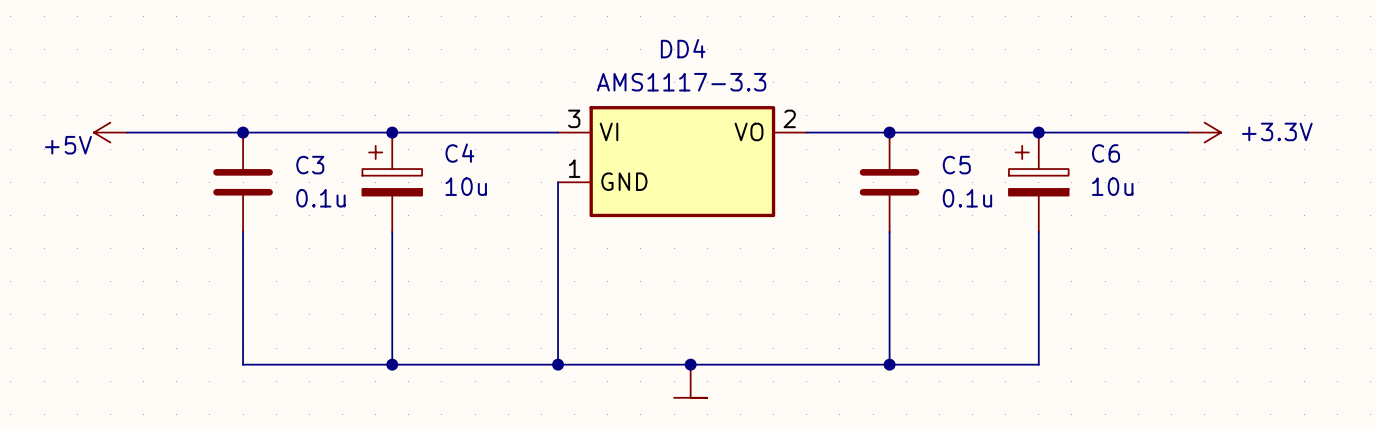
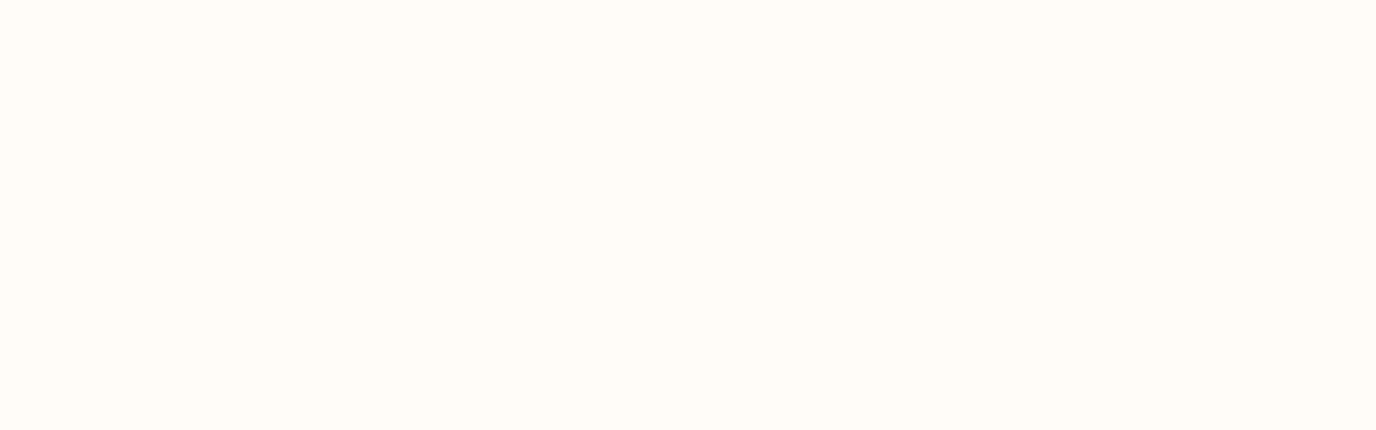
power symbol: +5V (110, 132) -> none
wire: (127, 132) (558, 132) -> none
junction: (243, 132) -> none
junction: (392, 132) -> none
wire: (806, 132) (1187, 132) -> none
junction: (889, 132) -> none
junction: (1038, 132) -> none
power symbol: +3.3V (1204, 132) -> none
DD4: AMS1117-3.3 (682, 161) -> none
C3: 0.1u (243, 182) -> none
C4: 10u (392, 182) -> none
wire: (558, 182) (558, 364) -> none
C5: 0.1u (889, 182) -> none
C6: 10u (1038, 182) -> none
wire: (243, 232) (243, 364) (1038, 364) (1038, 232) -> none
wire: (392, 232) (392, 364) -> none
wire: (889, 232) (889, 364) -> none
junction: (392, 364) -> none
junction: (558, 364) -> none
junction: (690, 364) -> none
junction: (889, 364) -> none
power symbol: (690, 381) -> none

